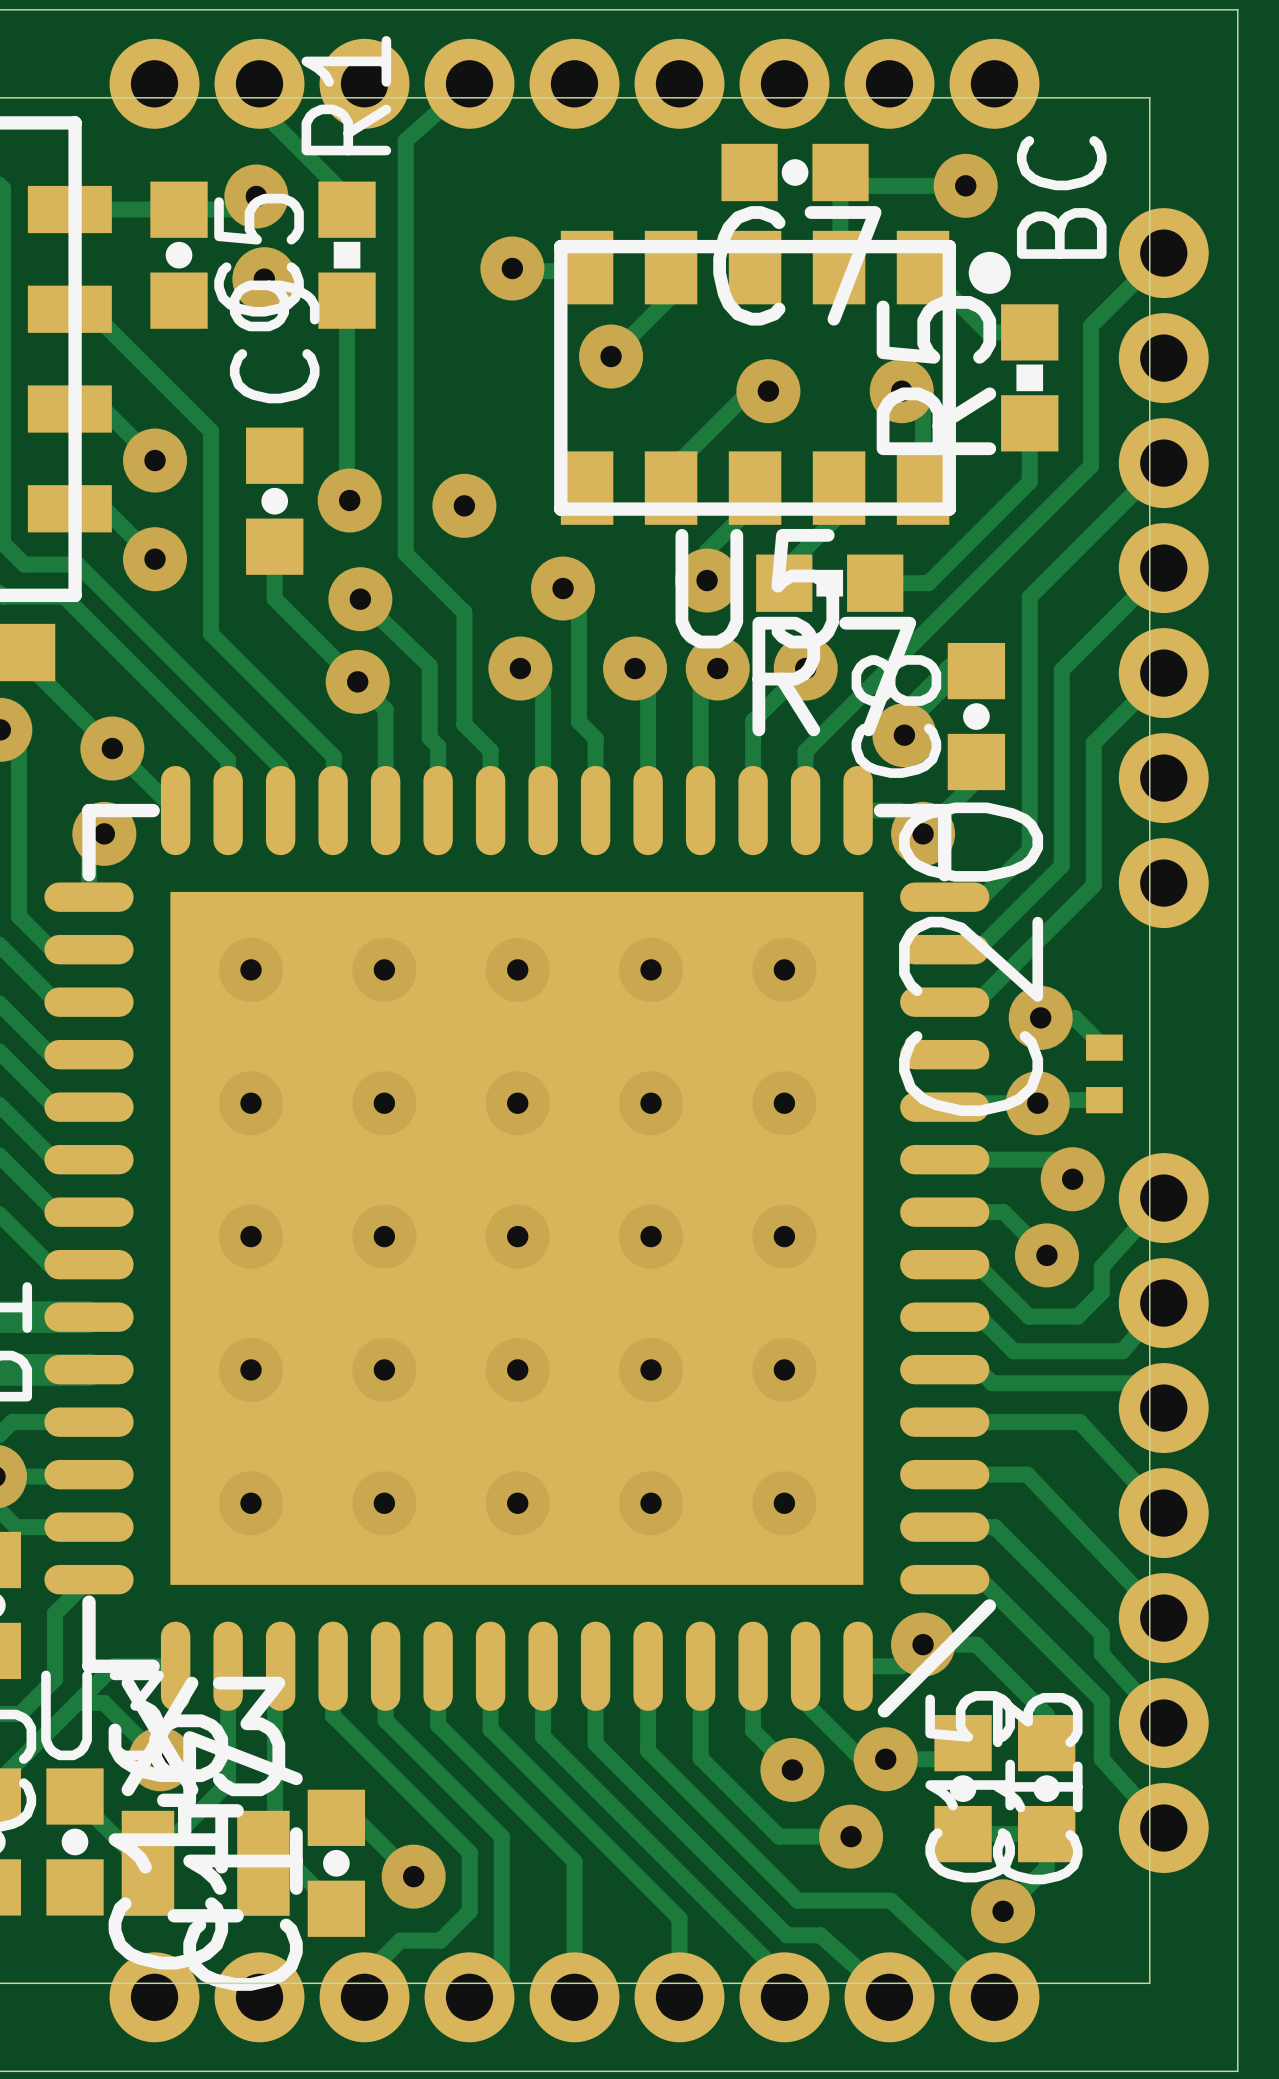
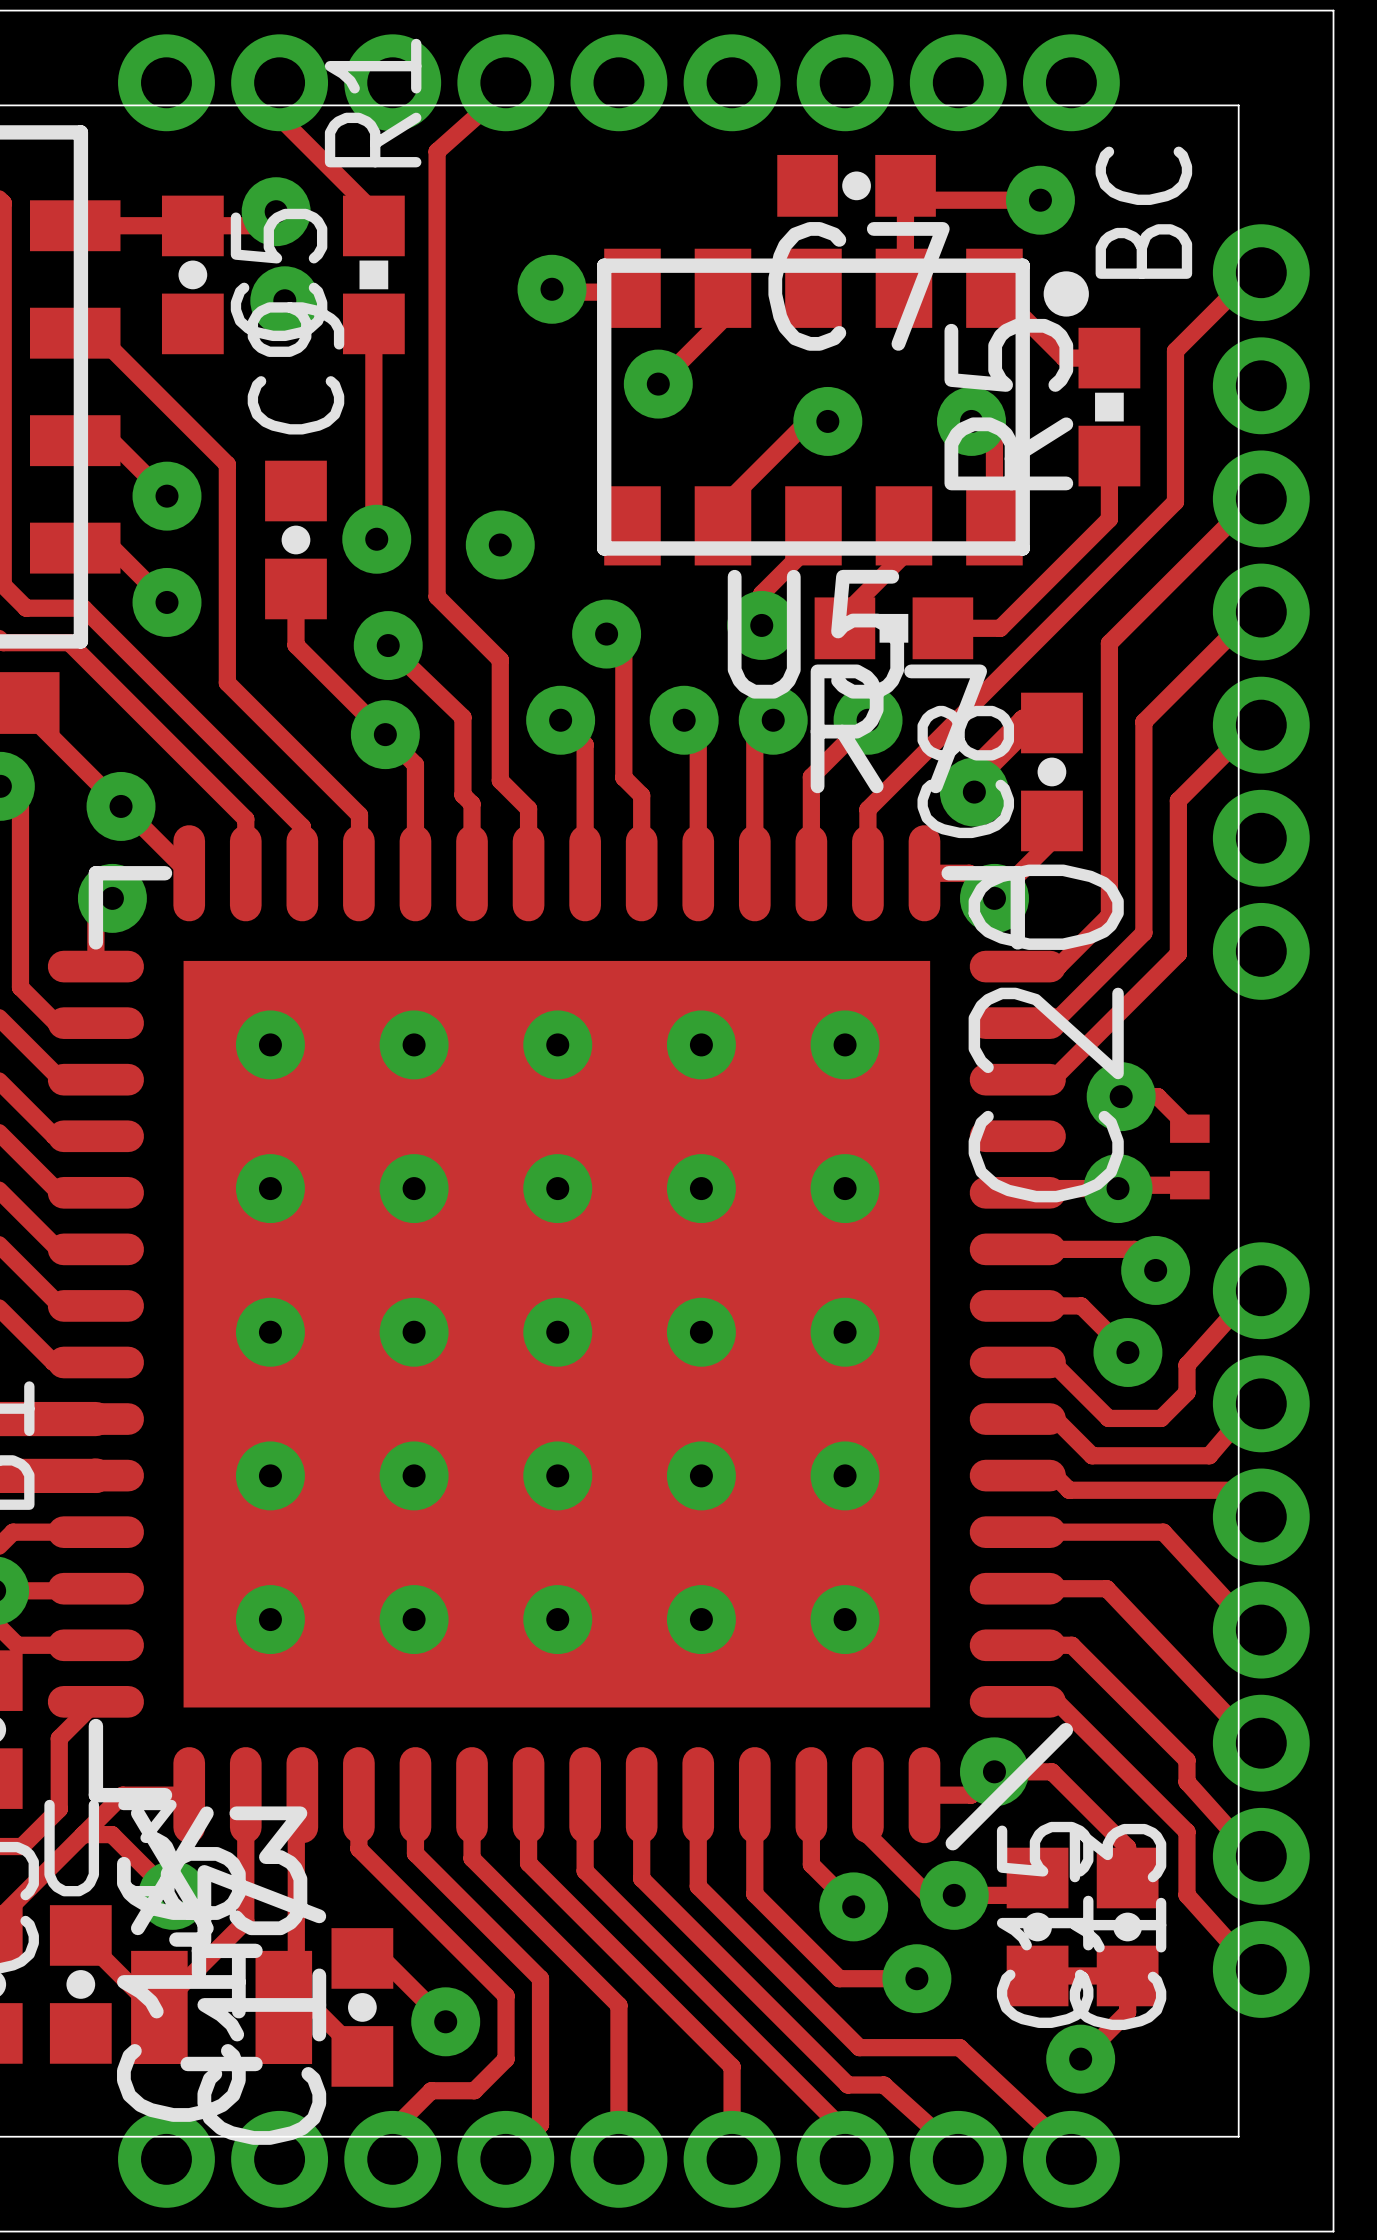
part footprint: [109, 38, 1209, 2043] -> [118, 34, 1310, 2208]

